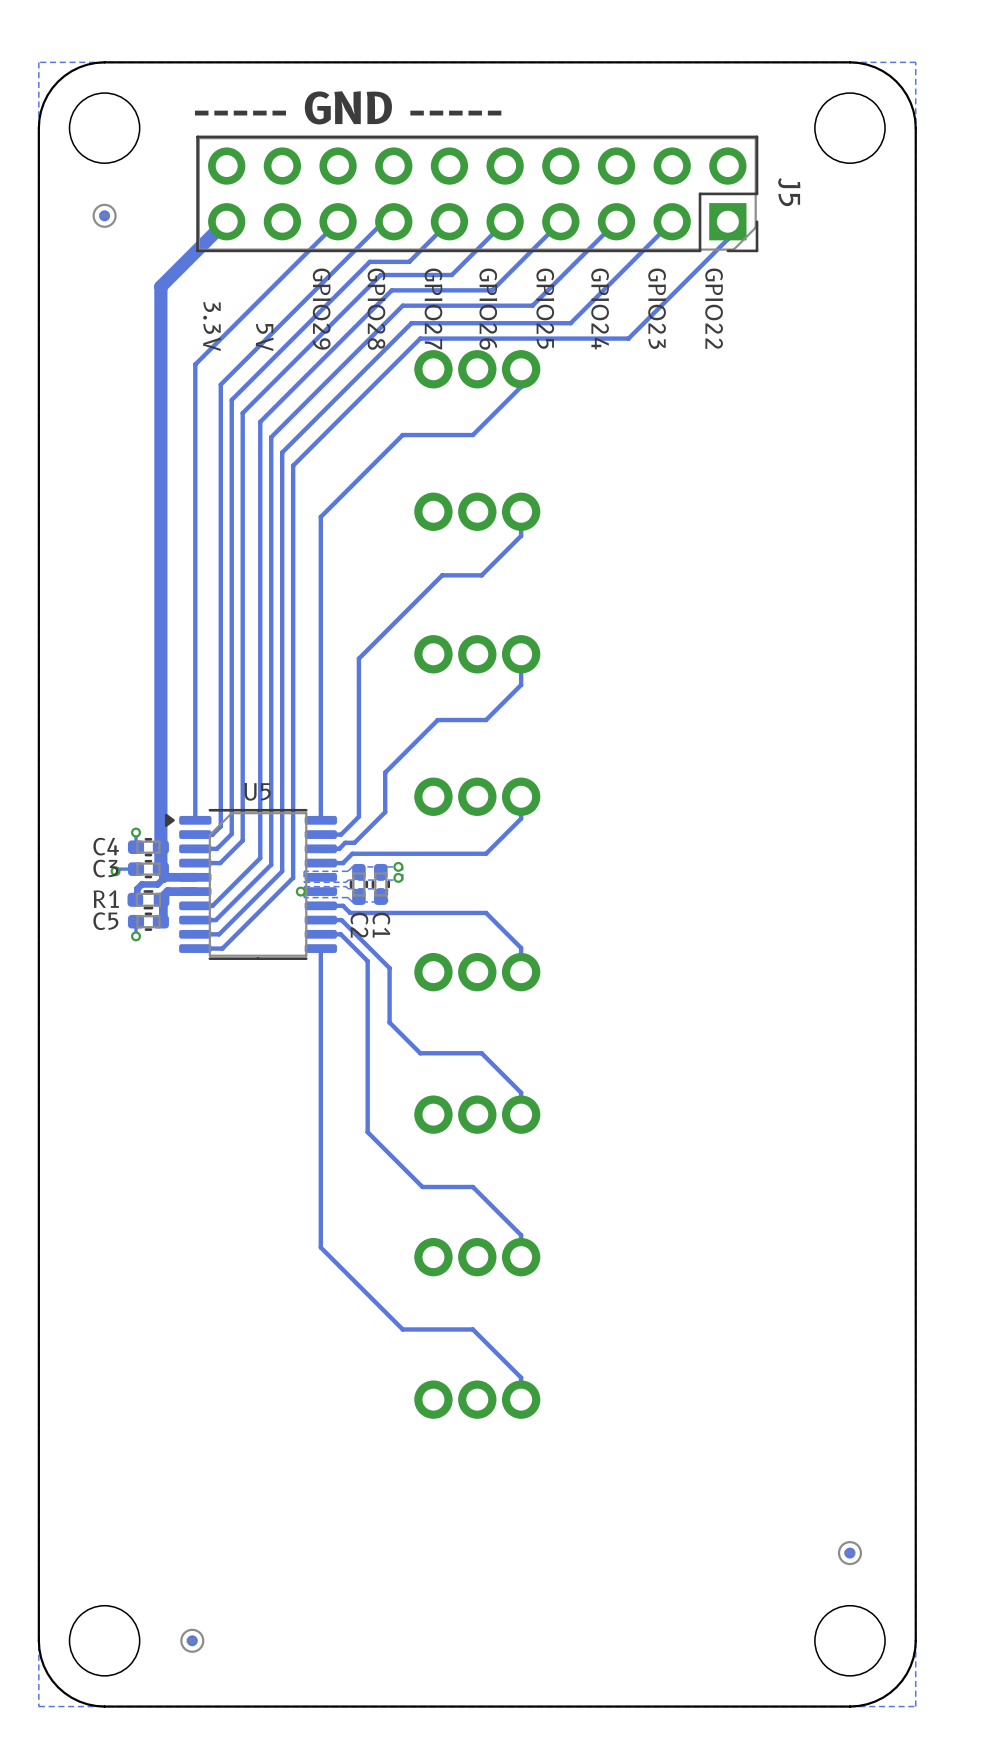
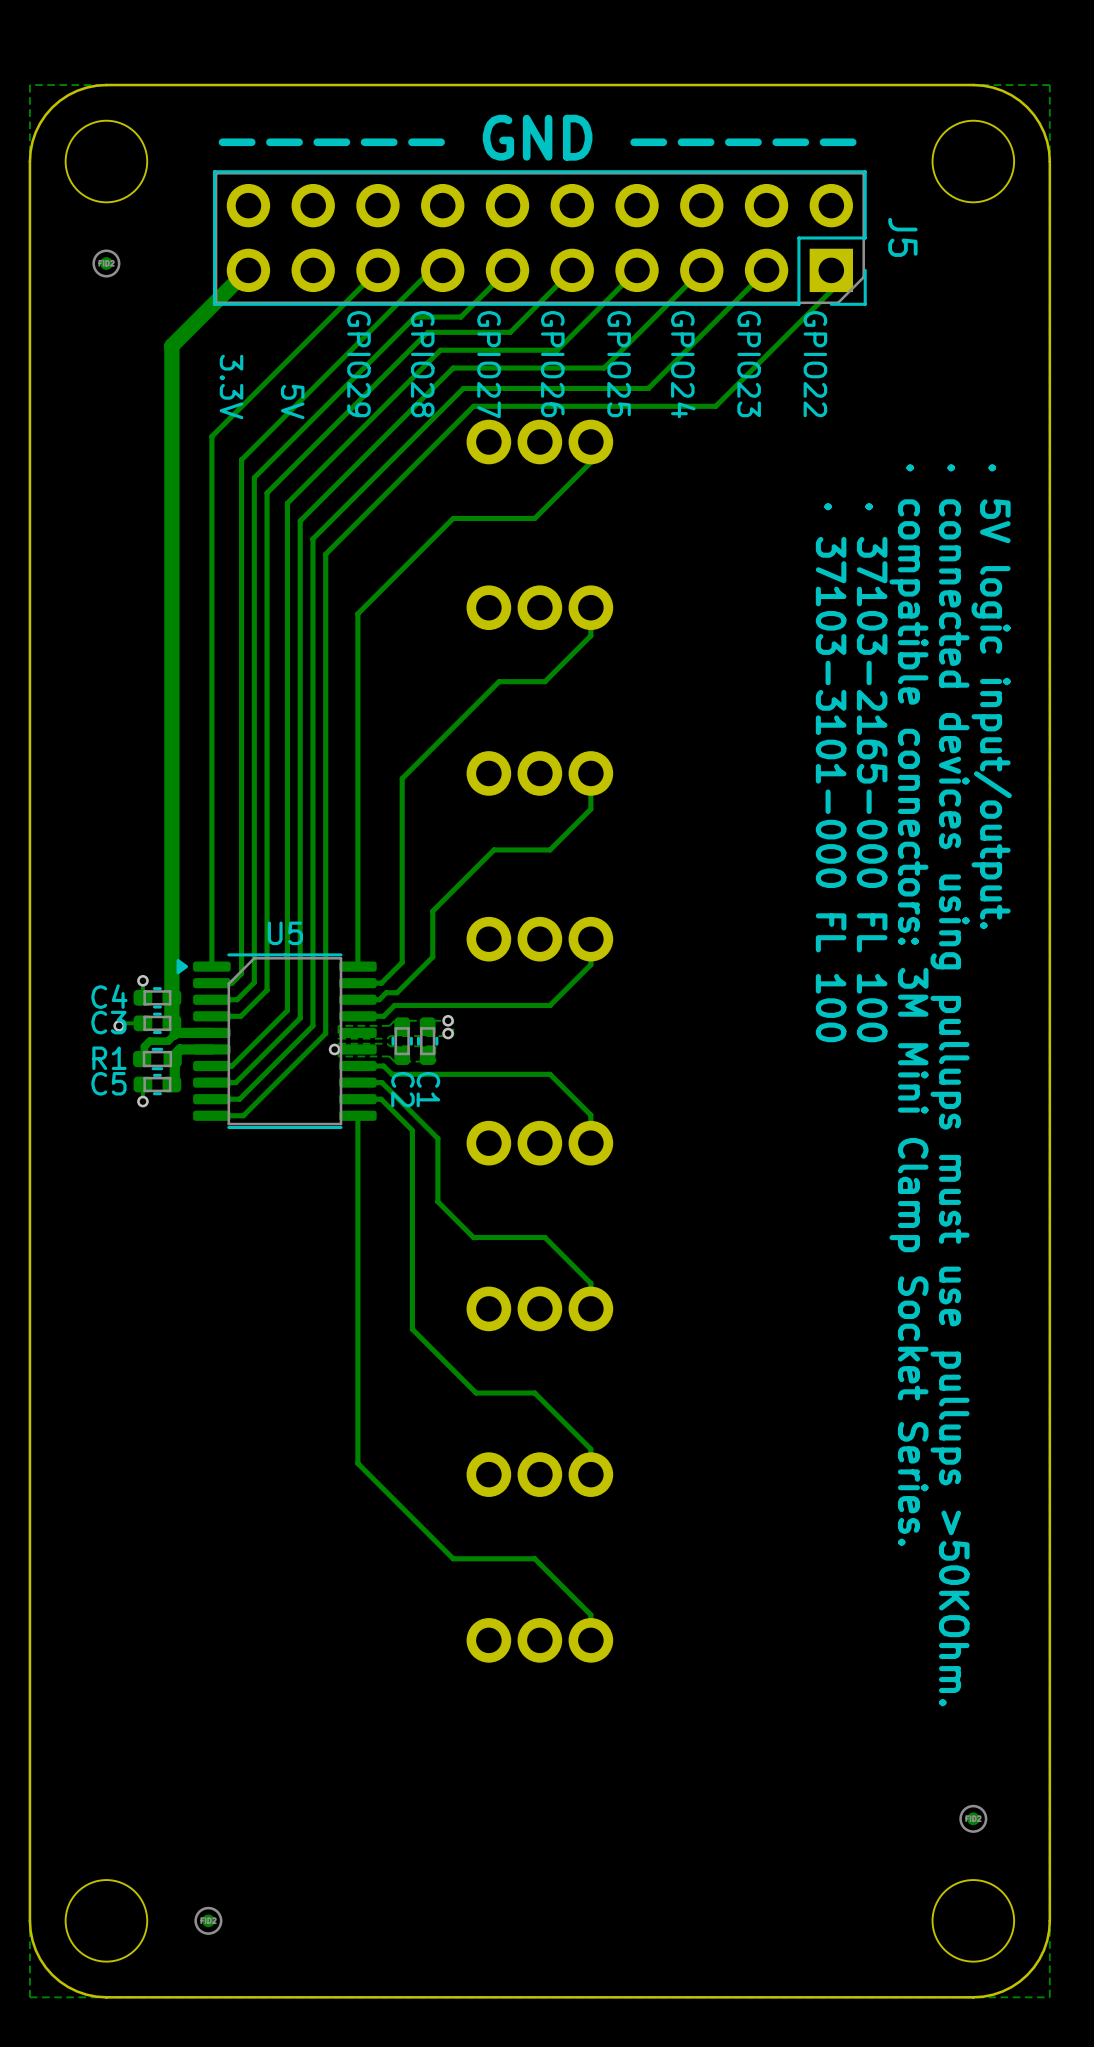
text: none -> · 5V logic input/output. (991, 696)
text: none -> · 37103-3101-000 FL 100 (831, 772)
text: none -> · 37103-2165-000 FL 100 (872, 772)
text: none -> · compatible connectors: 3M Mini Clamp Socket Series. (908, 1005)
text: none -> · connected devices using pullups must use pullups >50KOhm. (950, 1085)

